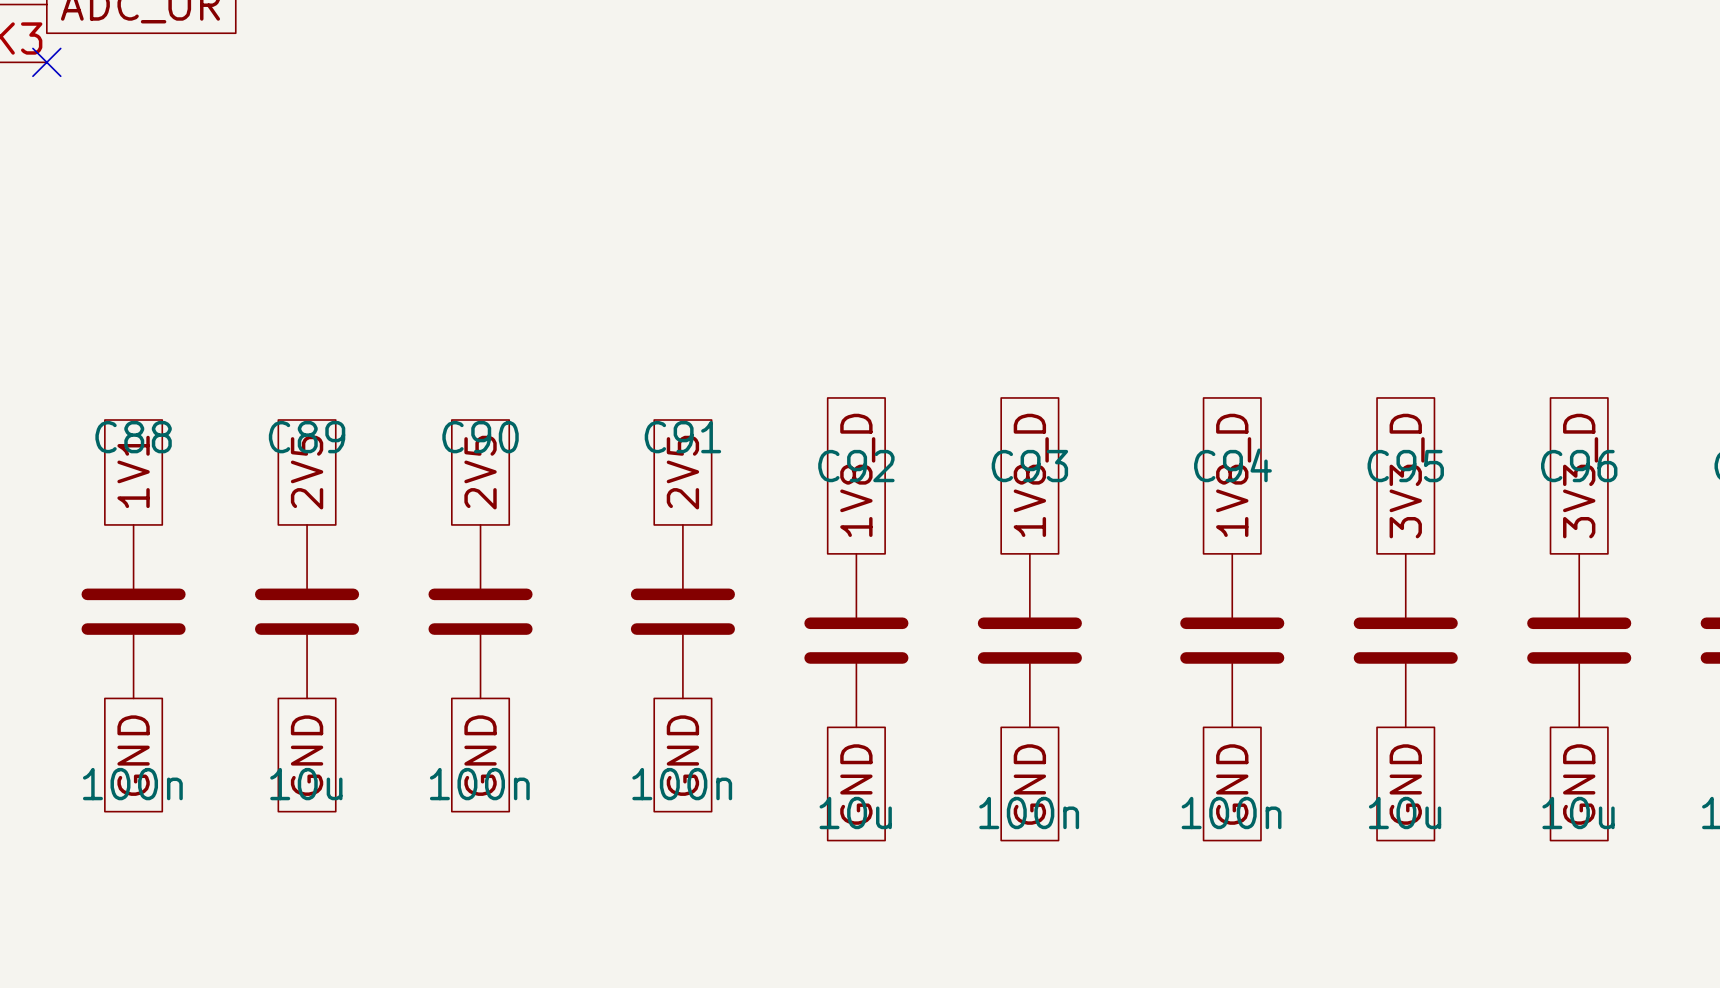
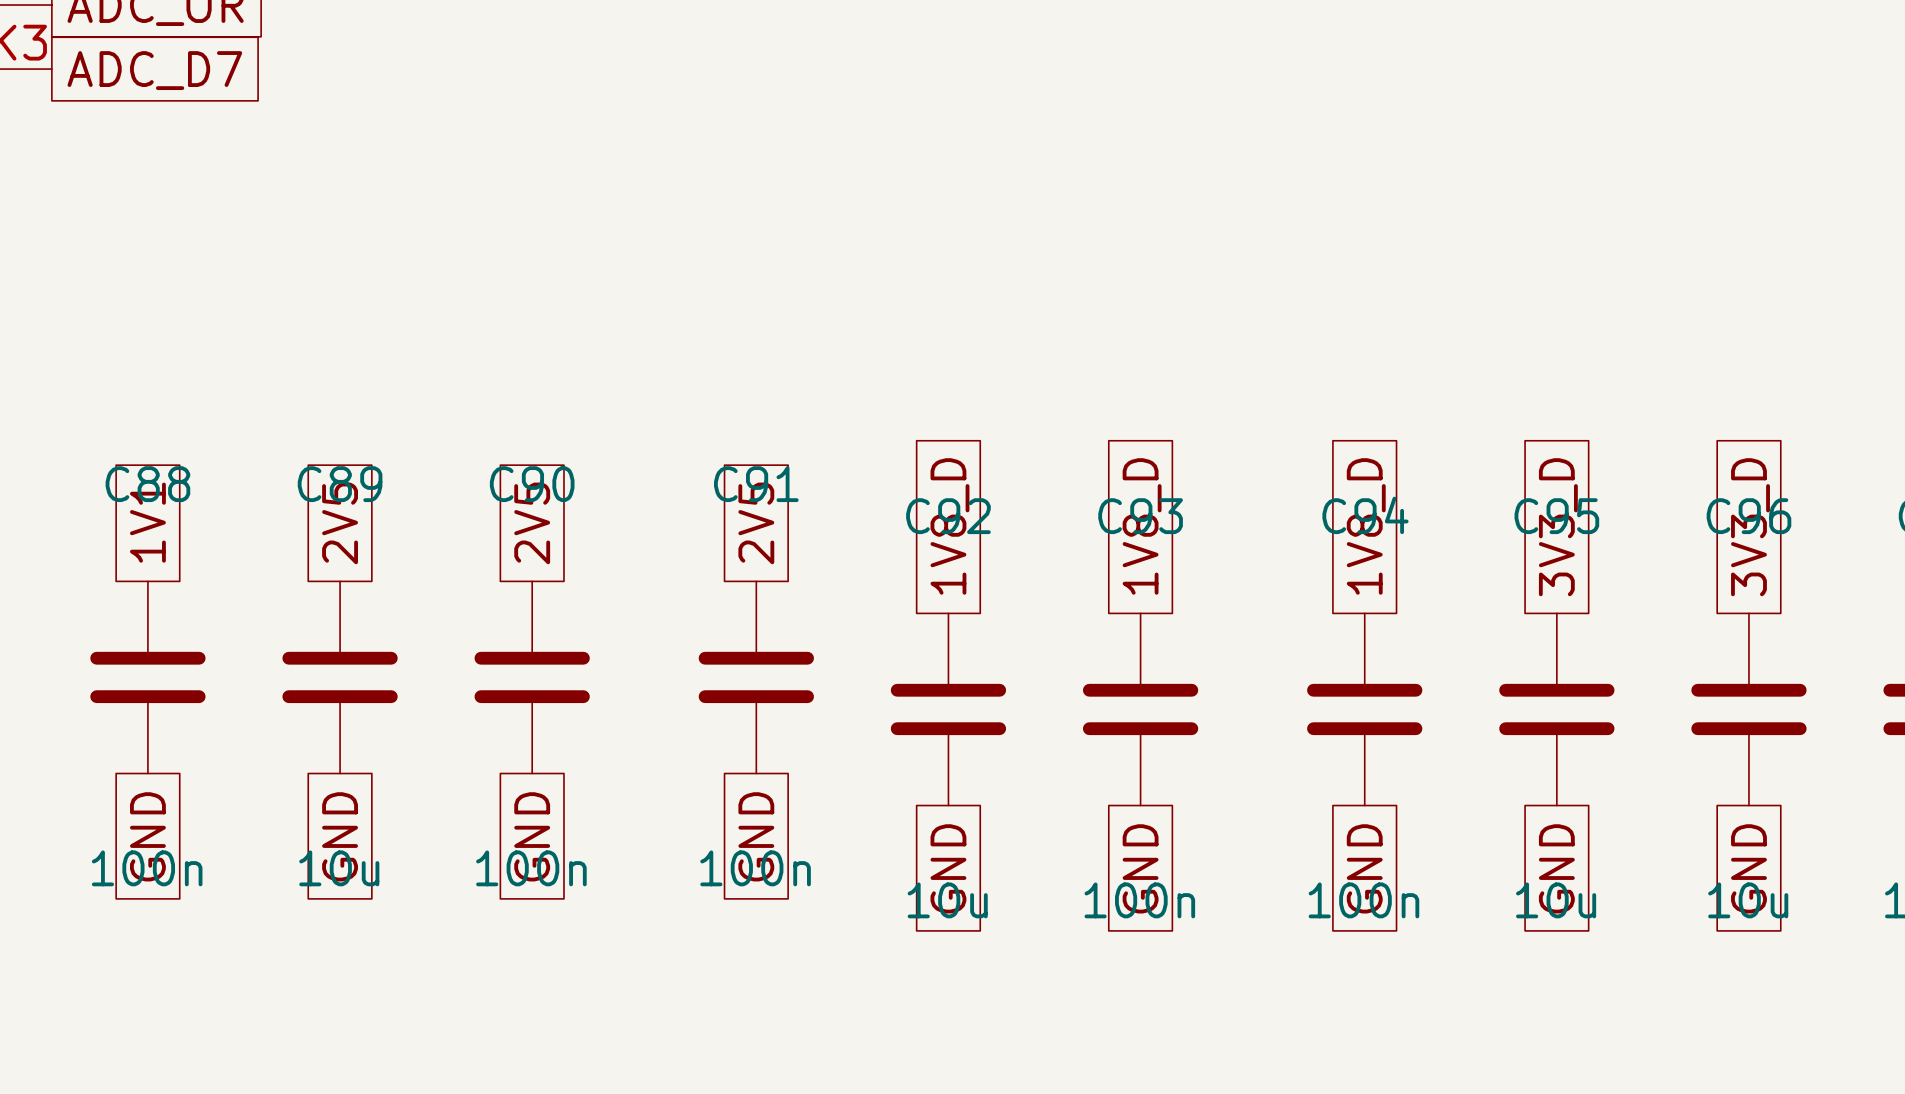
no-connect mark: (46, 62) -> none
global label: none -> ADC_D7 (154, 70)

